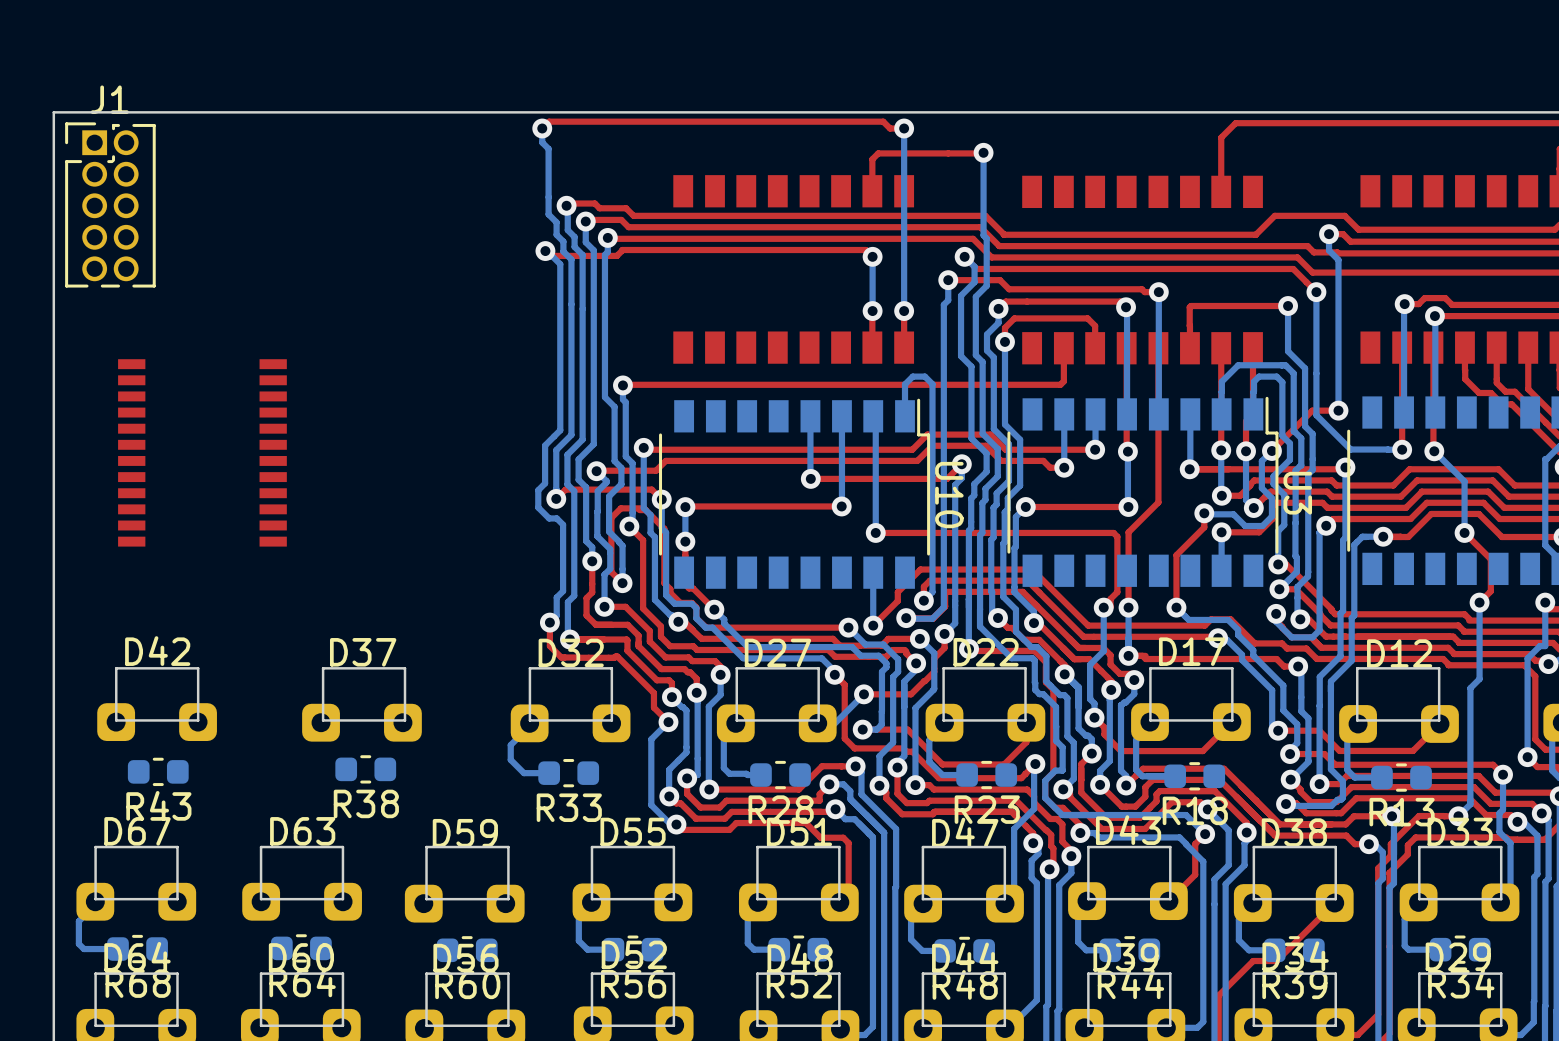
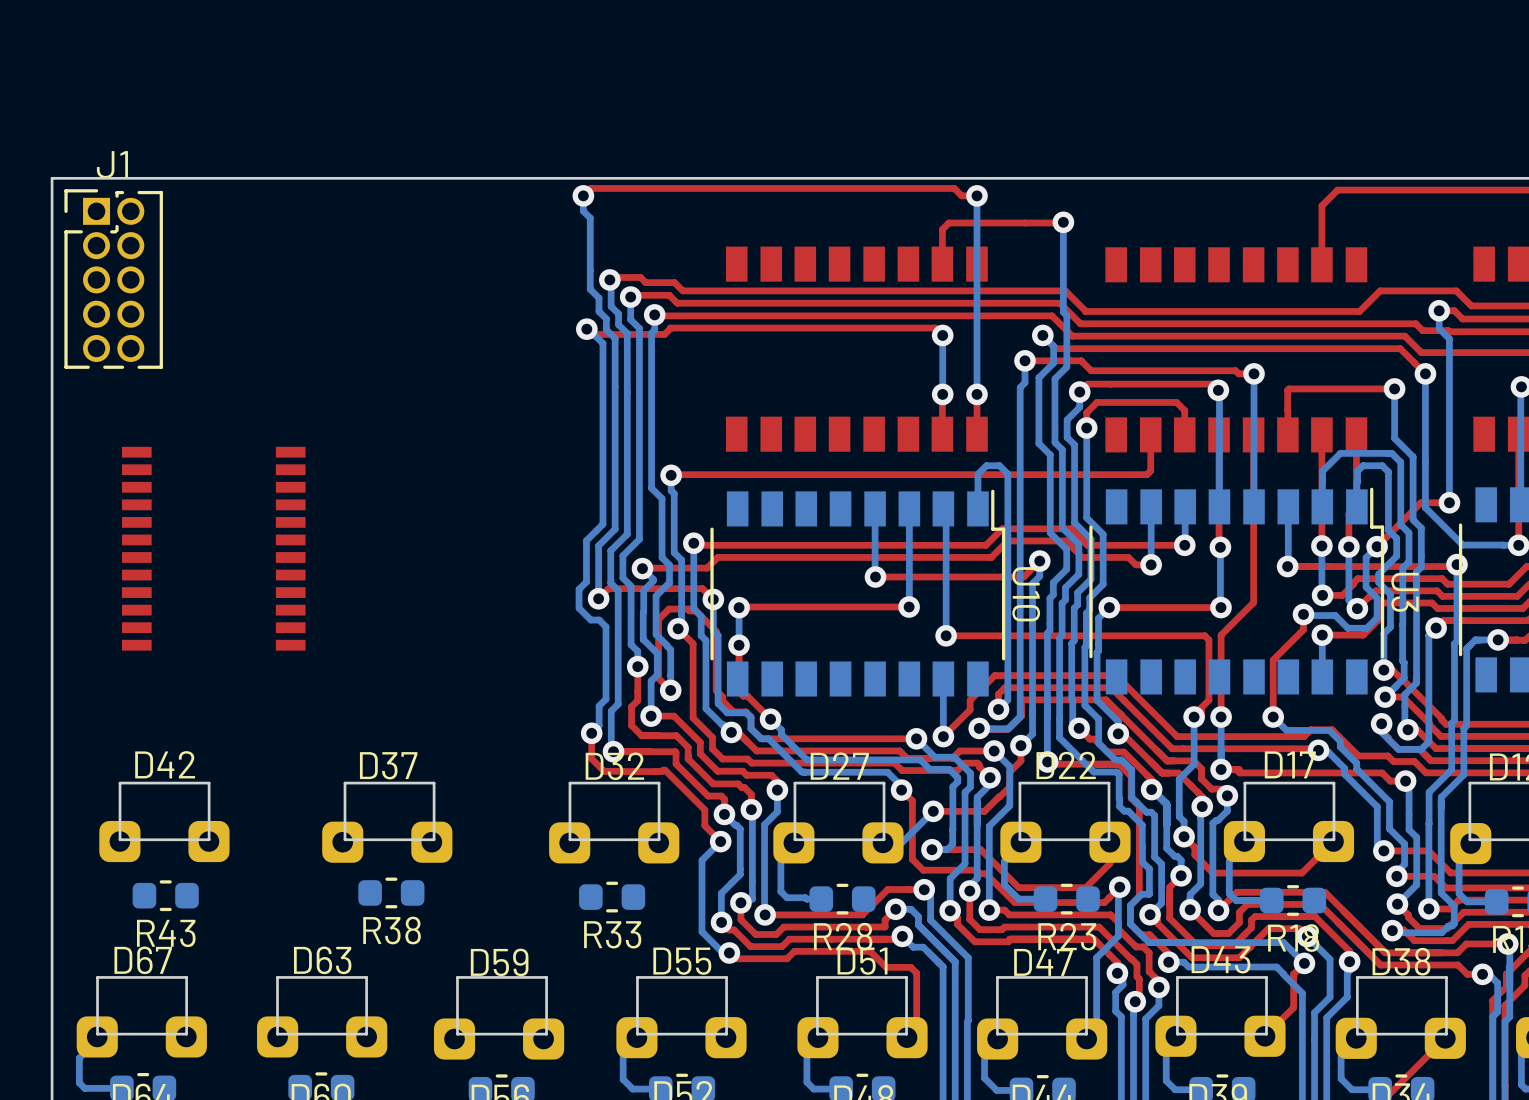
bottom track: (529, 729) (526, 729) (510, 745) (510, 759) (523, 773) (549, 773) -> none

